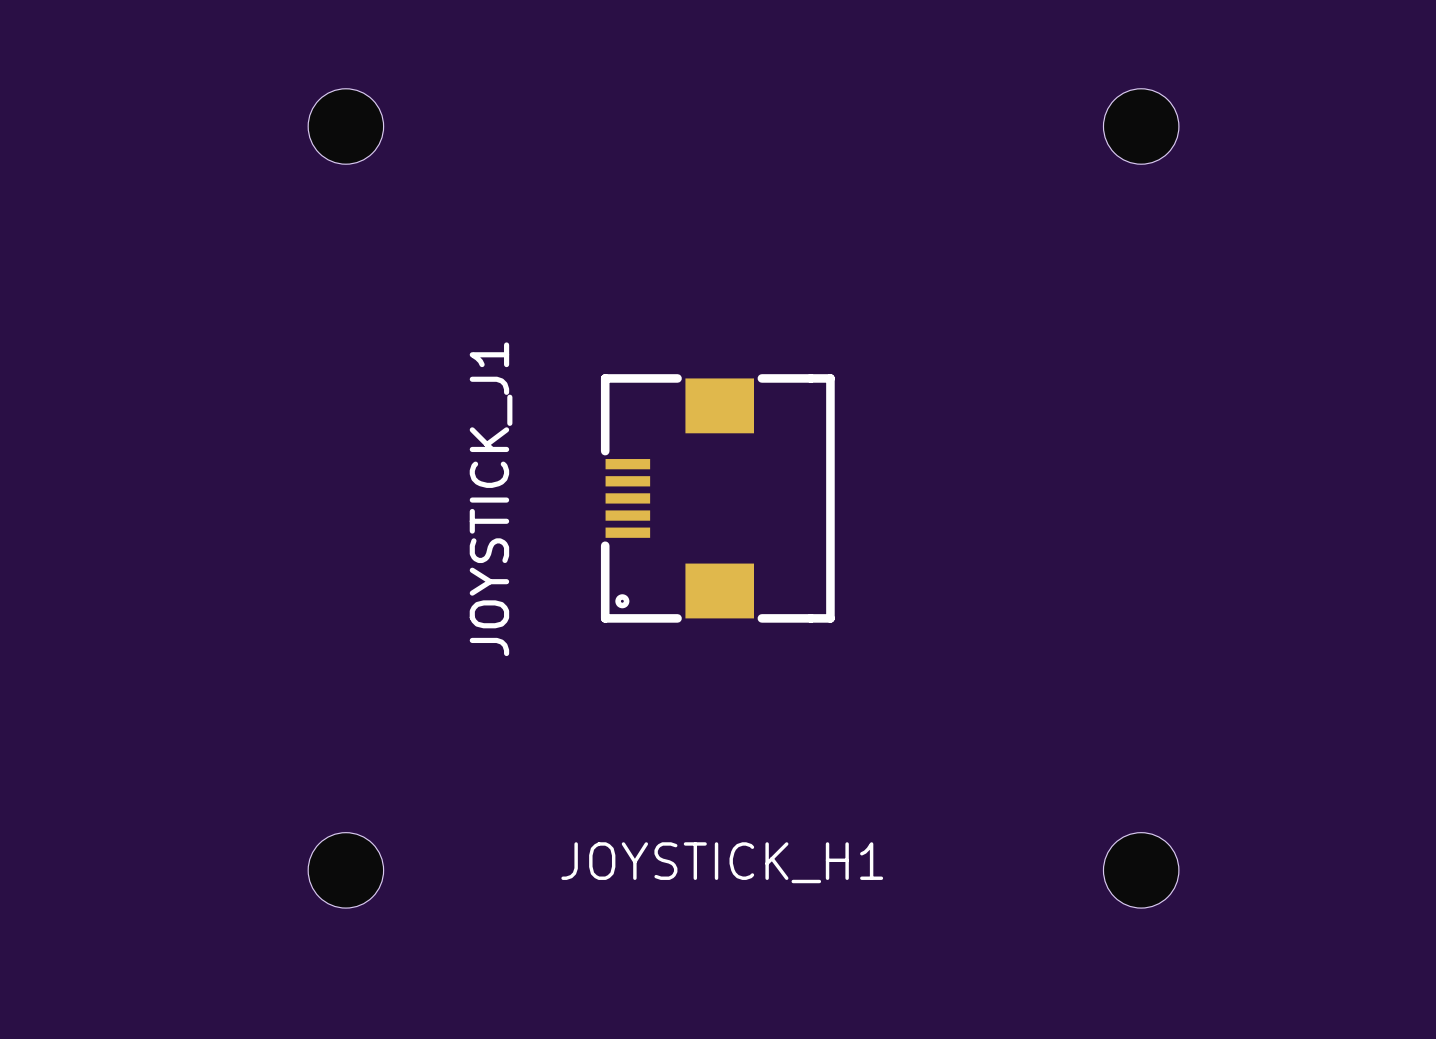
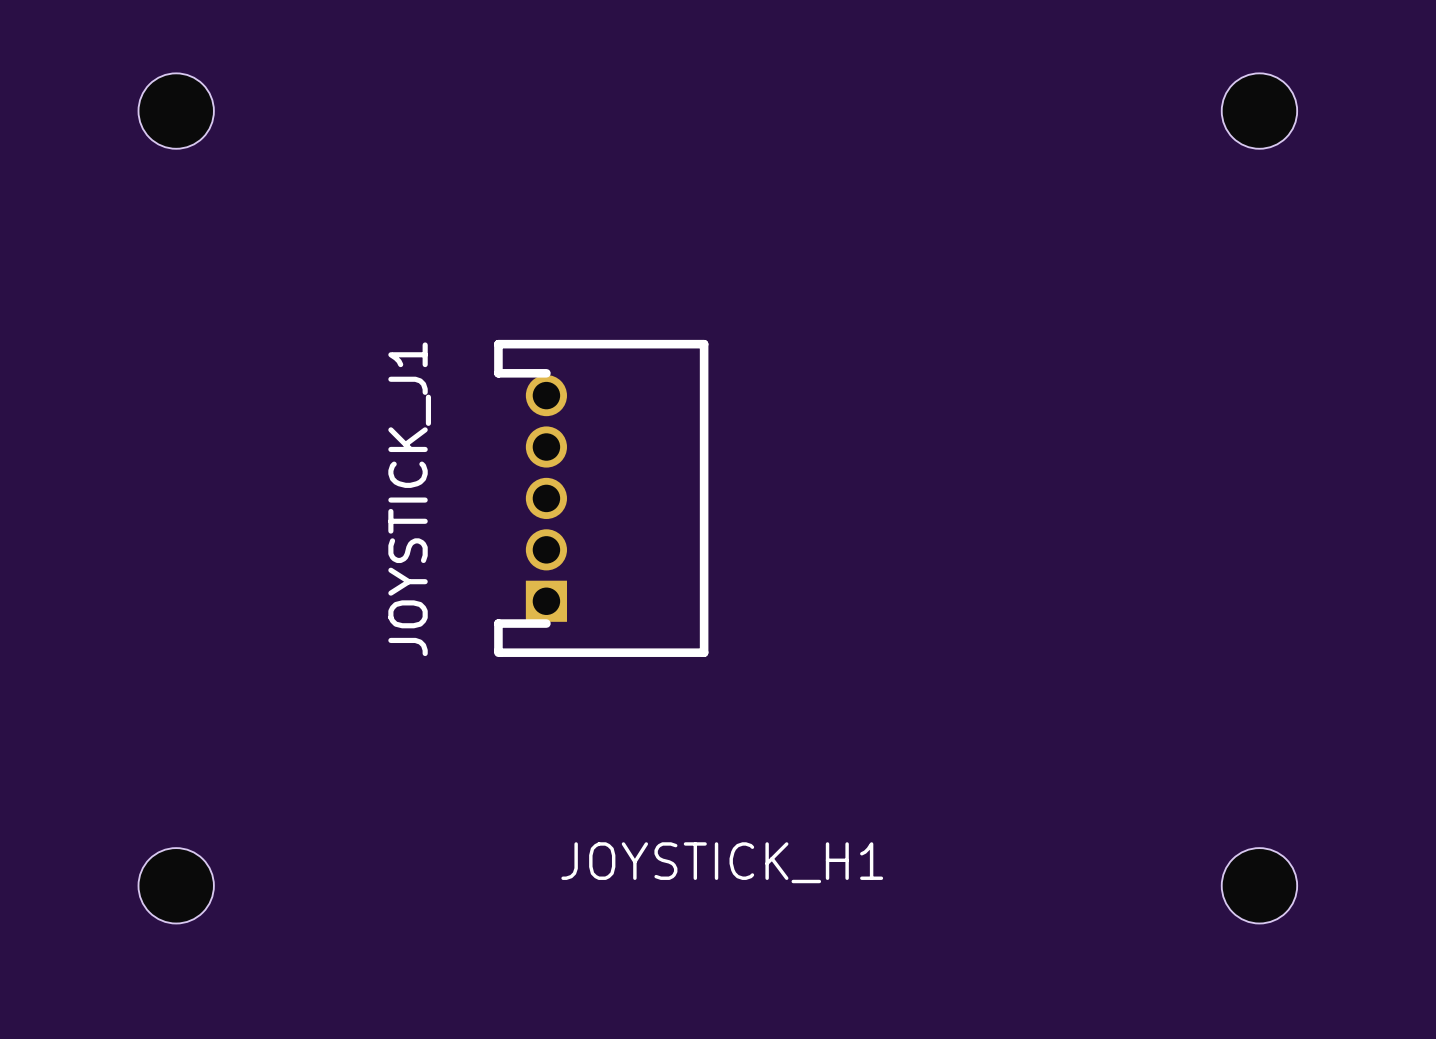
JOYSTICK_H1 footprint: [308, 88, 1179, 909] -> [138, 73, 1298, 924]
JOYSTICK_J1 footprint: [600, 374, 835, 623] -> [494, 339, 709, 657]

